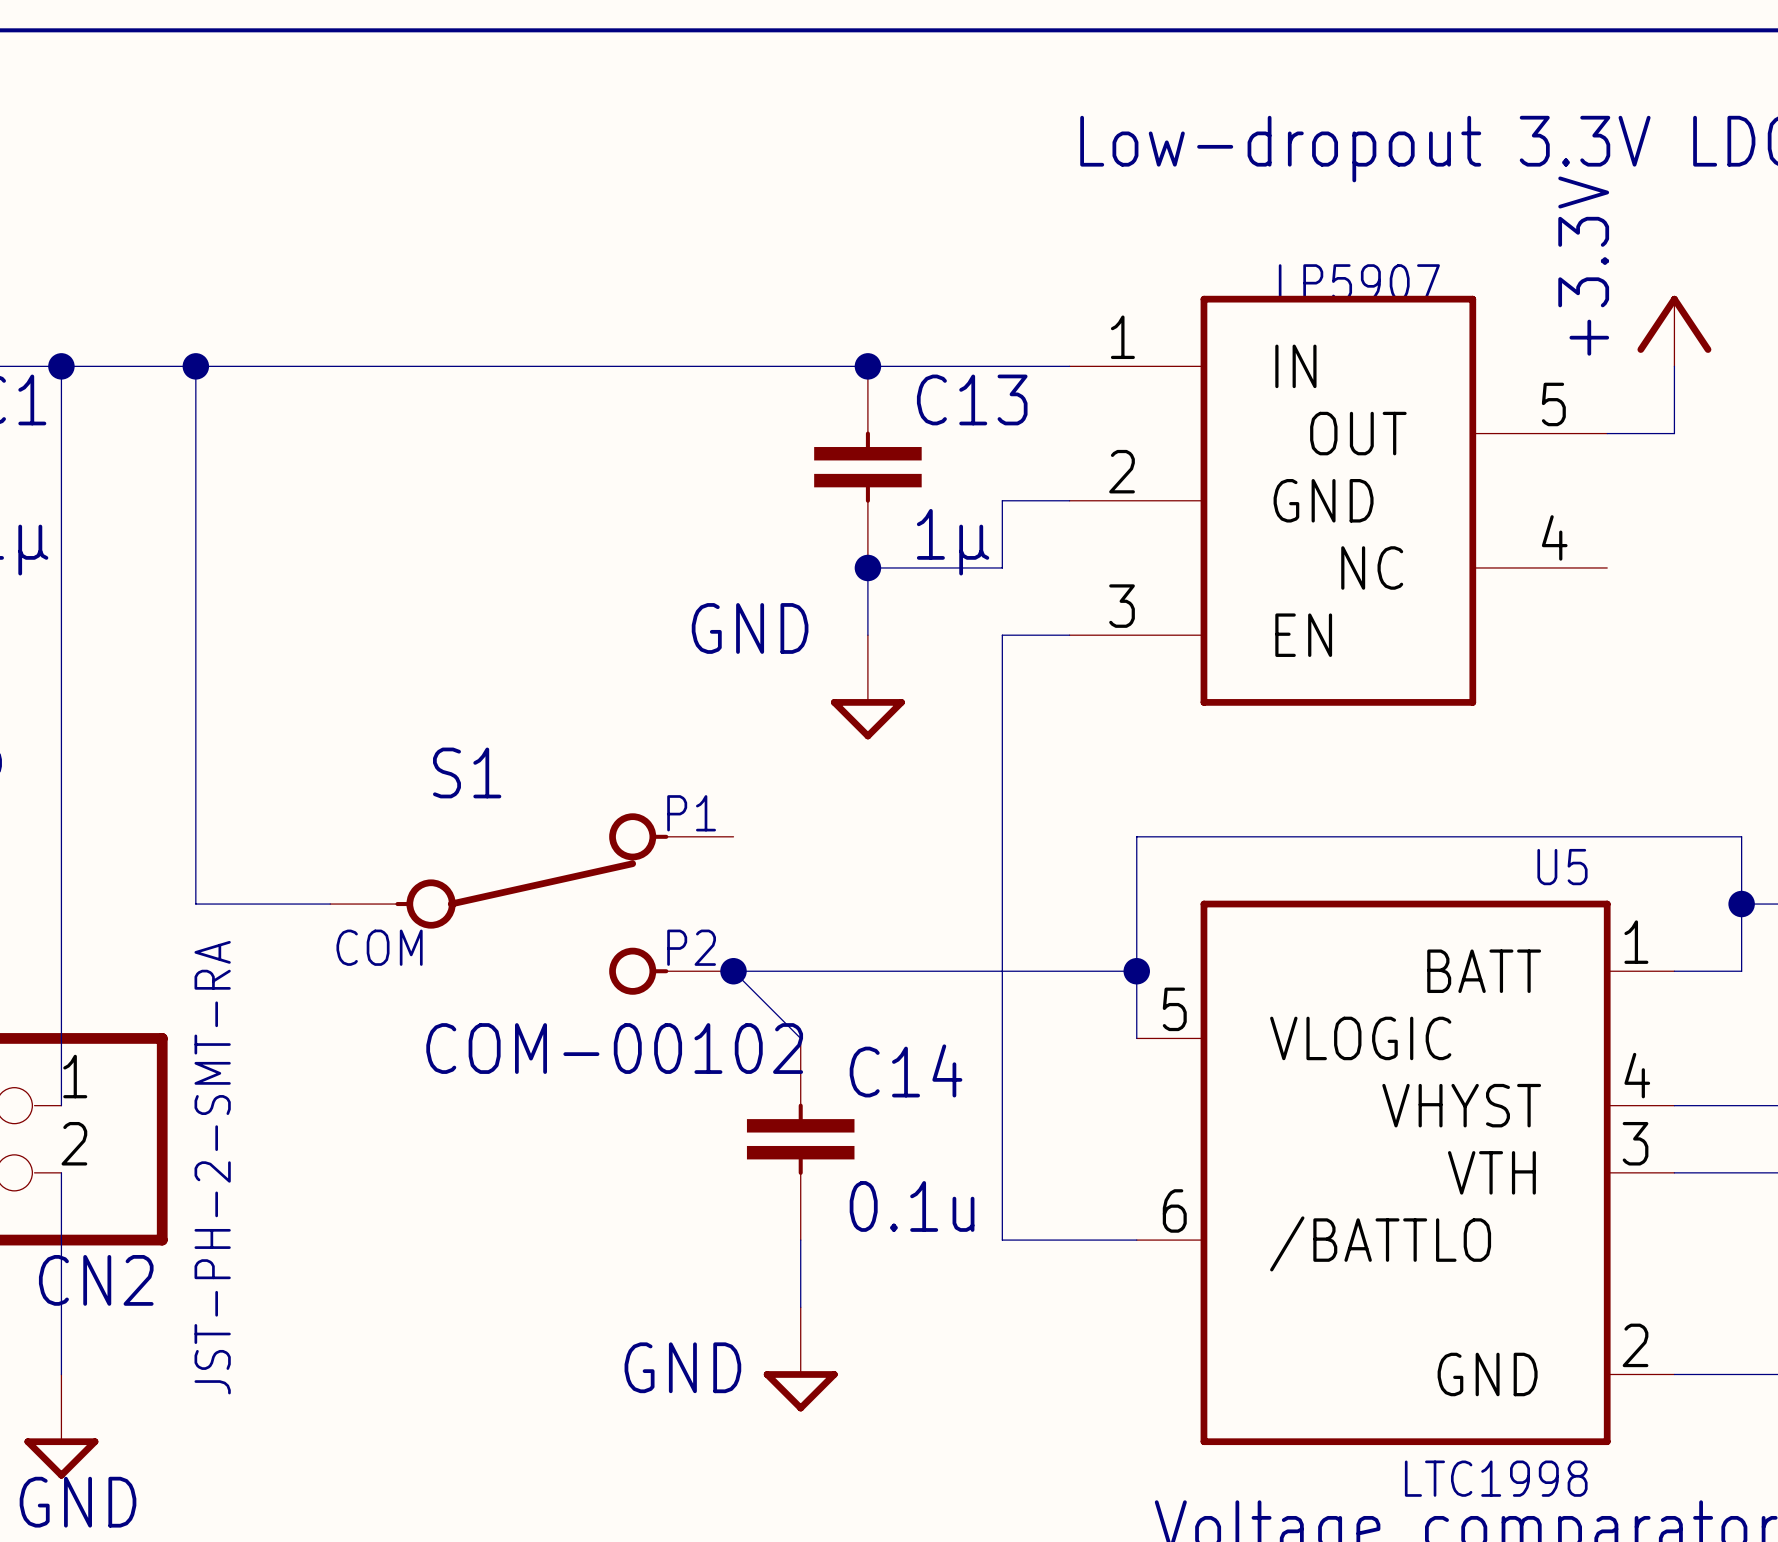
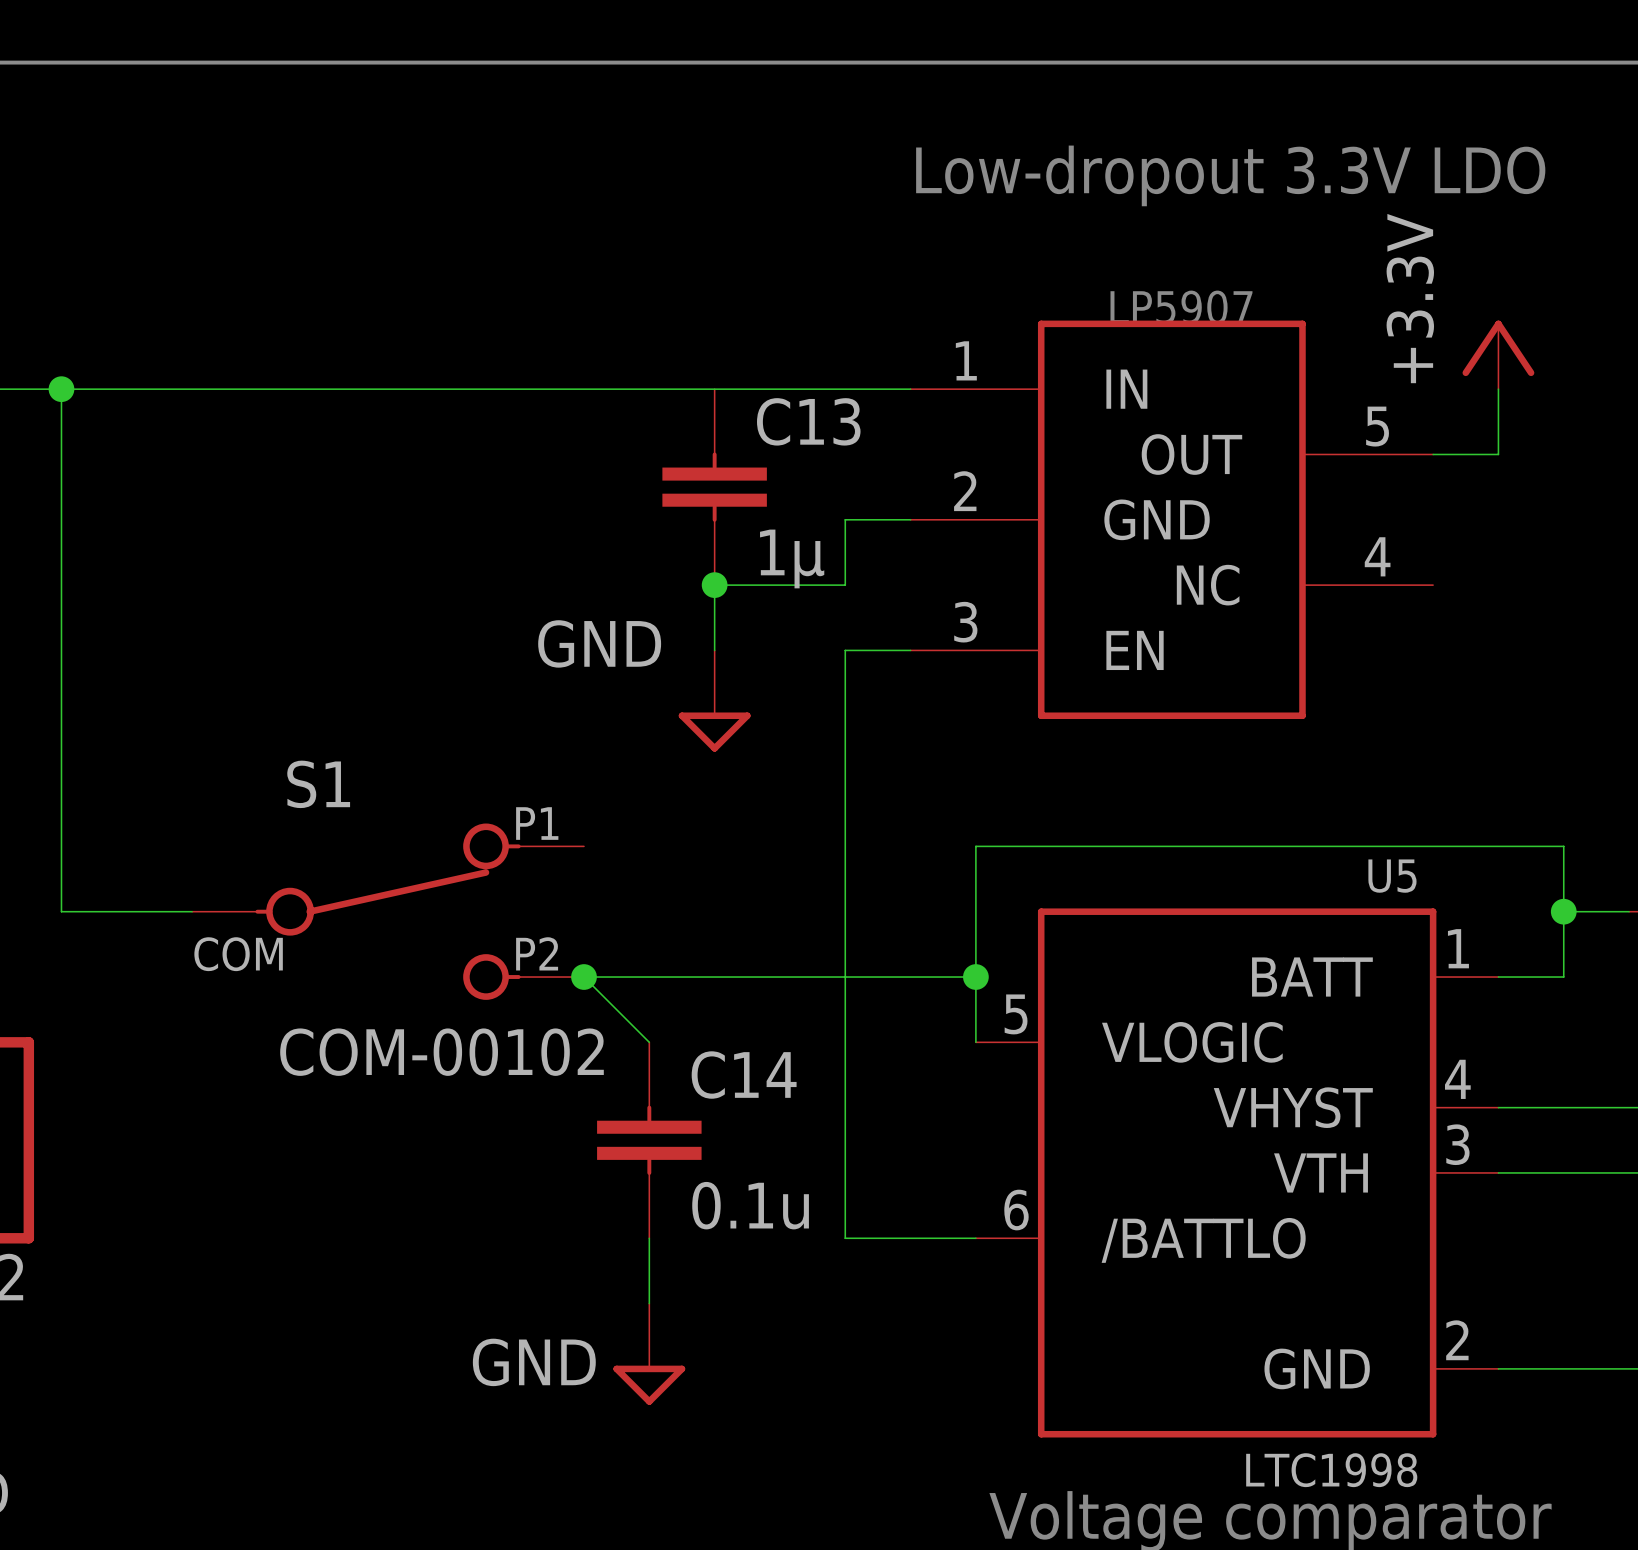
junction: (867, 366) -> none
CN2 value: JST-PH-2-SMT-RA (212, 1167) -> none

